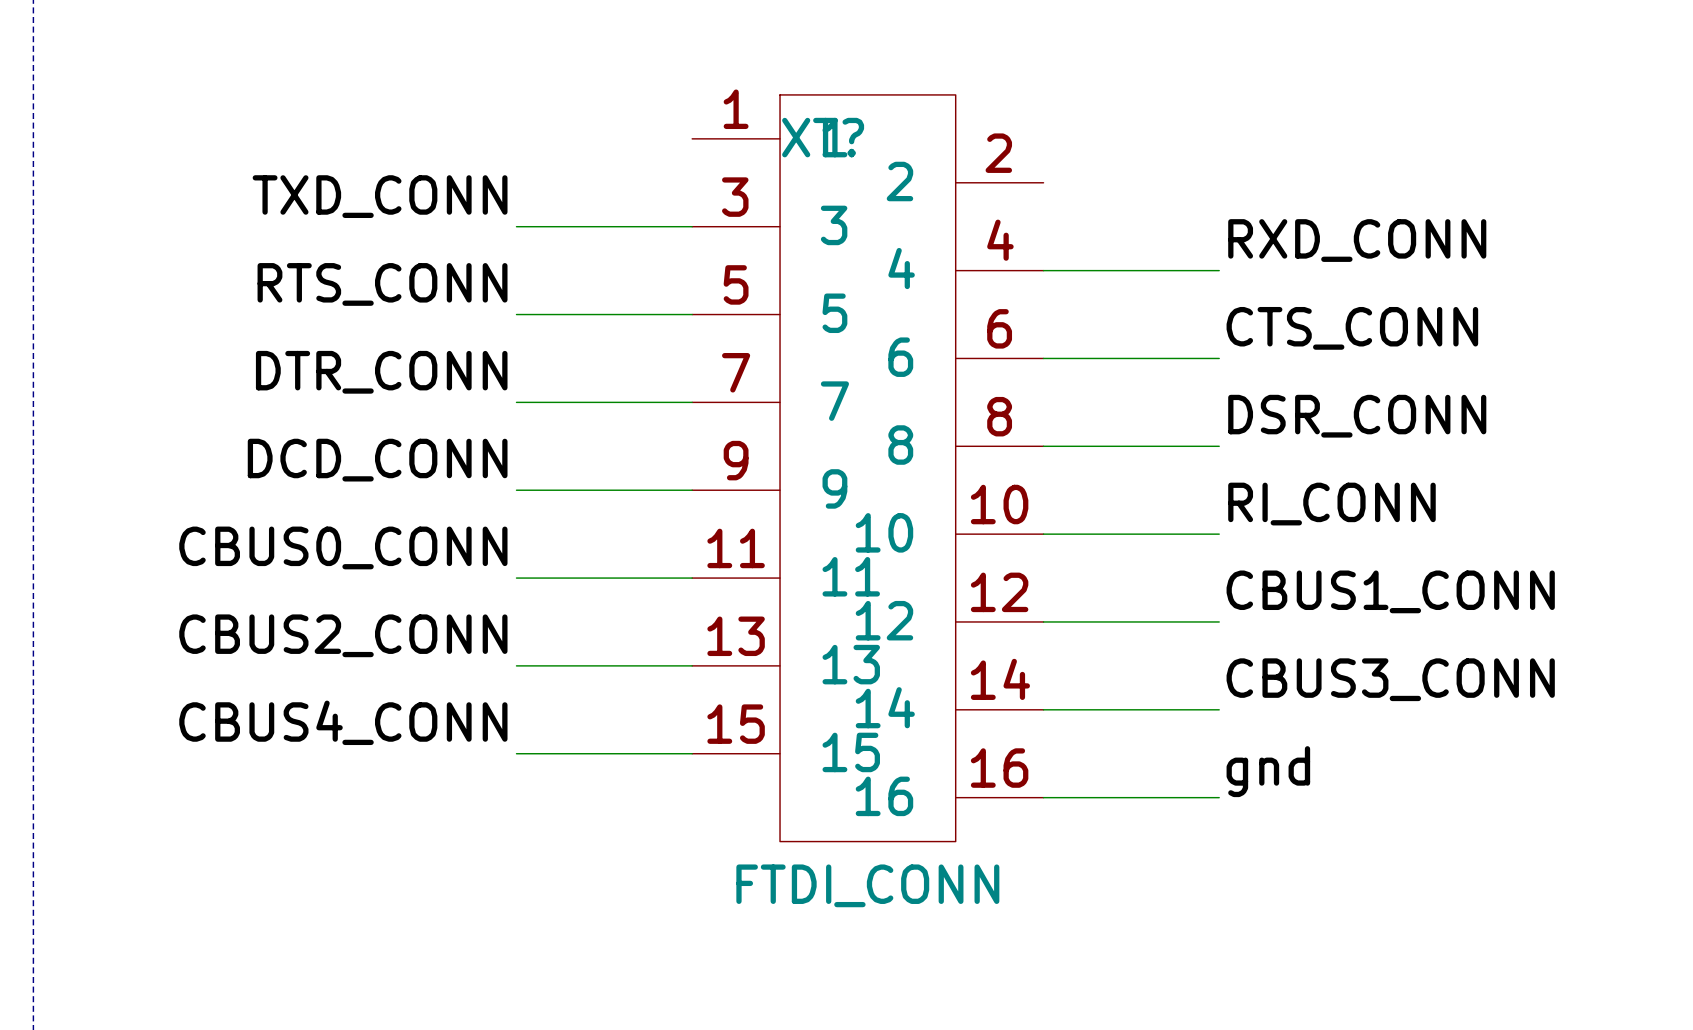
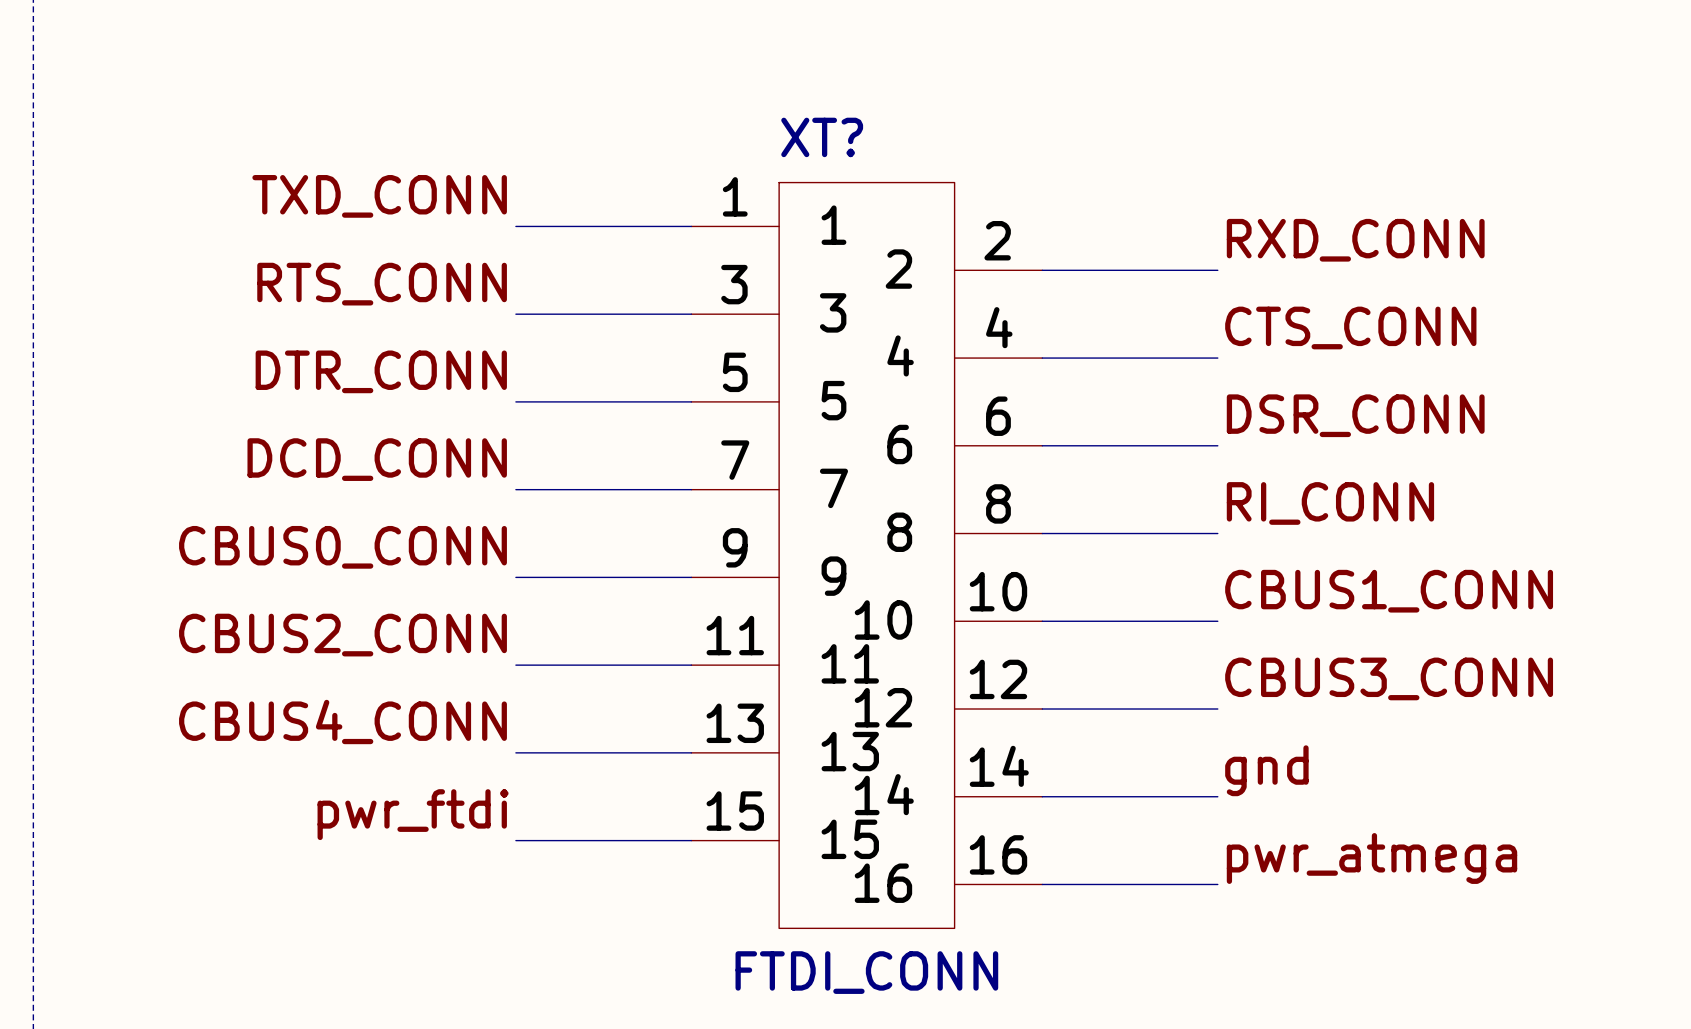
XT? position: (867, 468) -> (866, 555)
label: none -> pwr_ftdi (413, 814)
wire: none -> (515, 840) (691, 840)
label: none -> pwr_atmega (1371, 858)
wire: none -> (1042, 884) (1217, 884)

